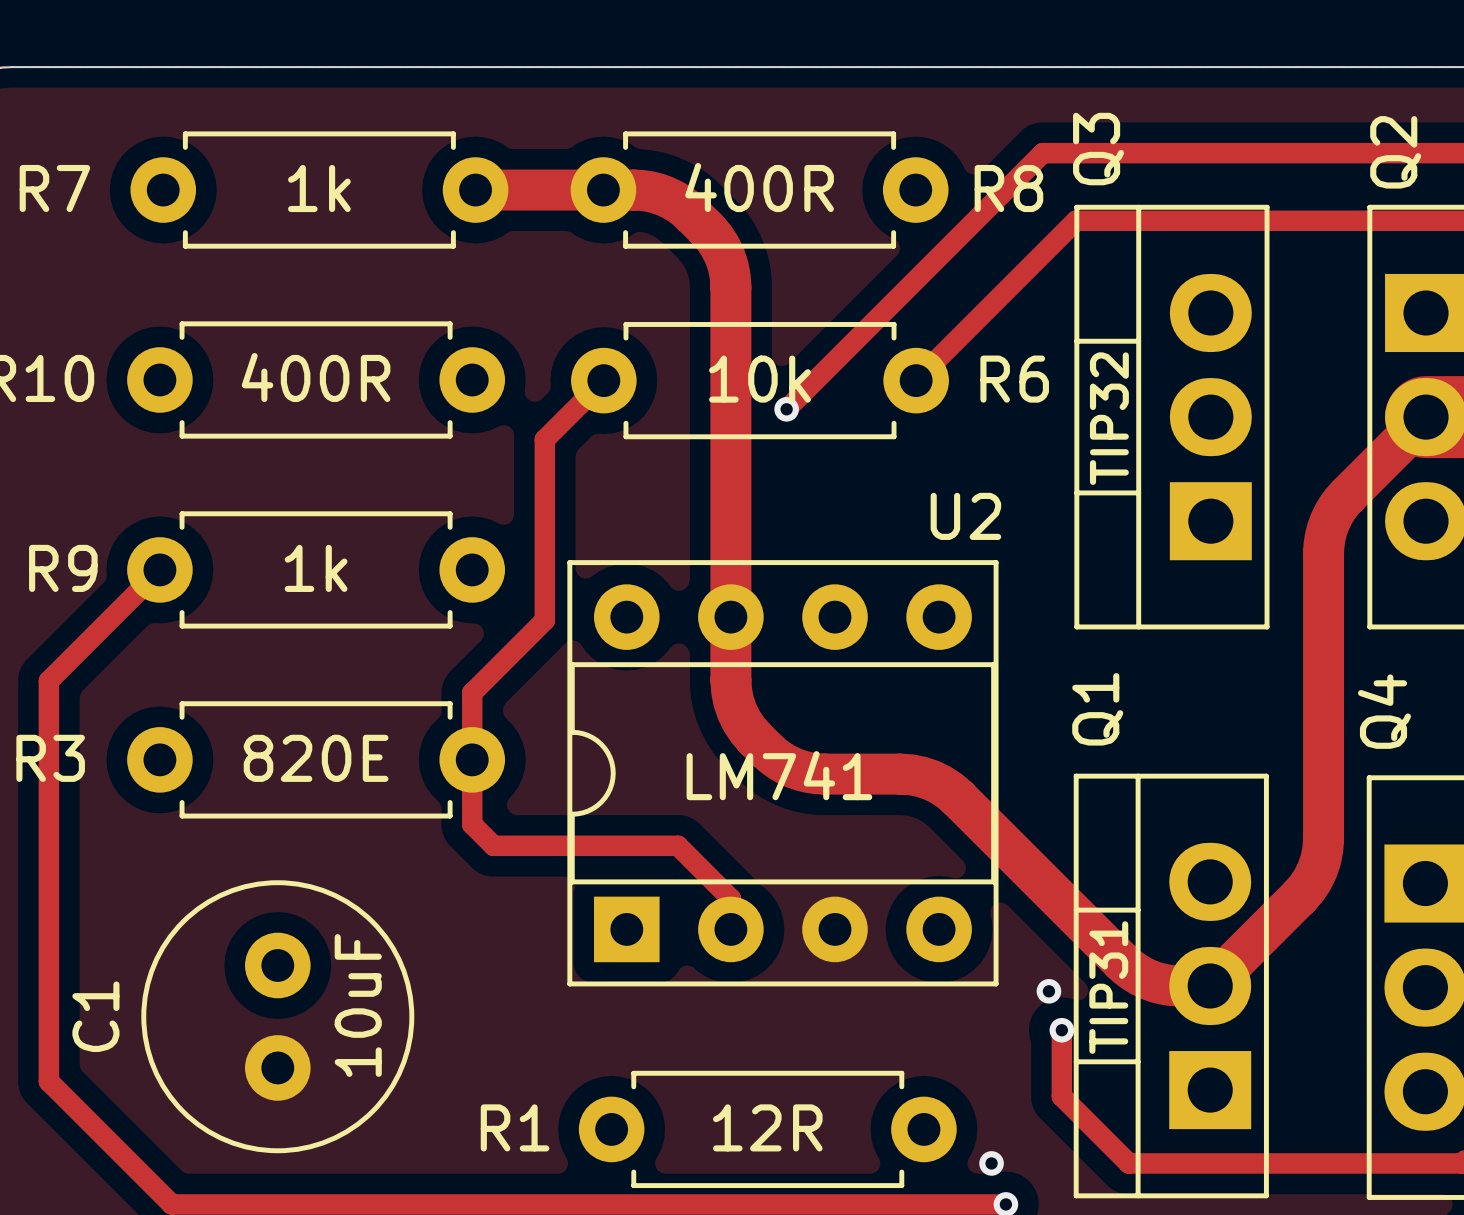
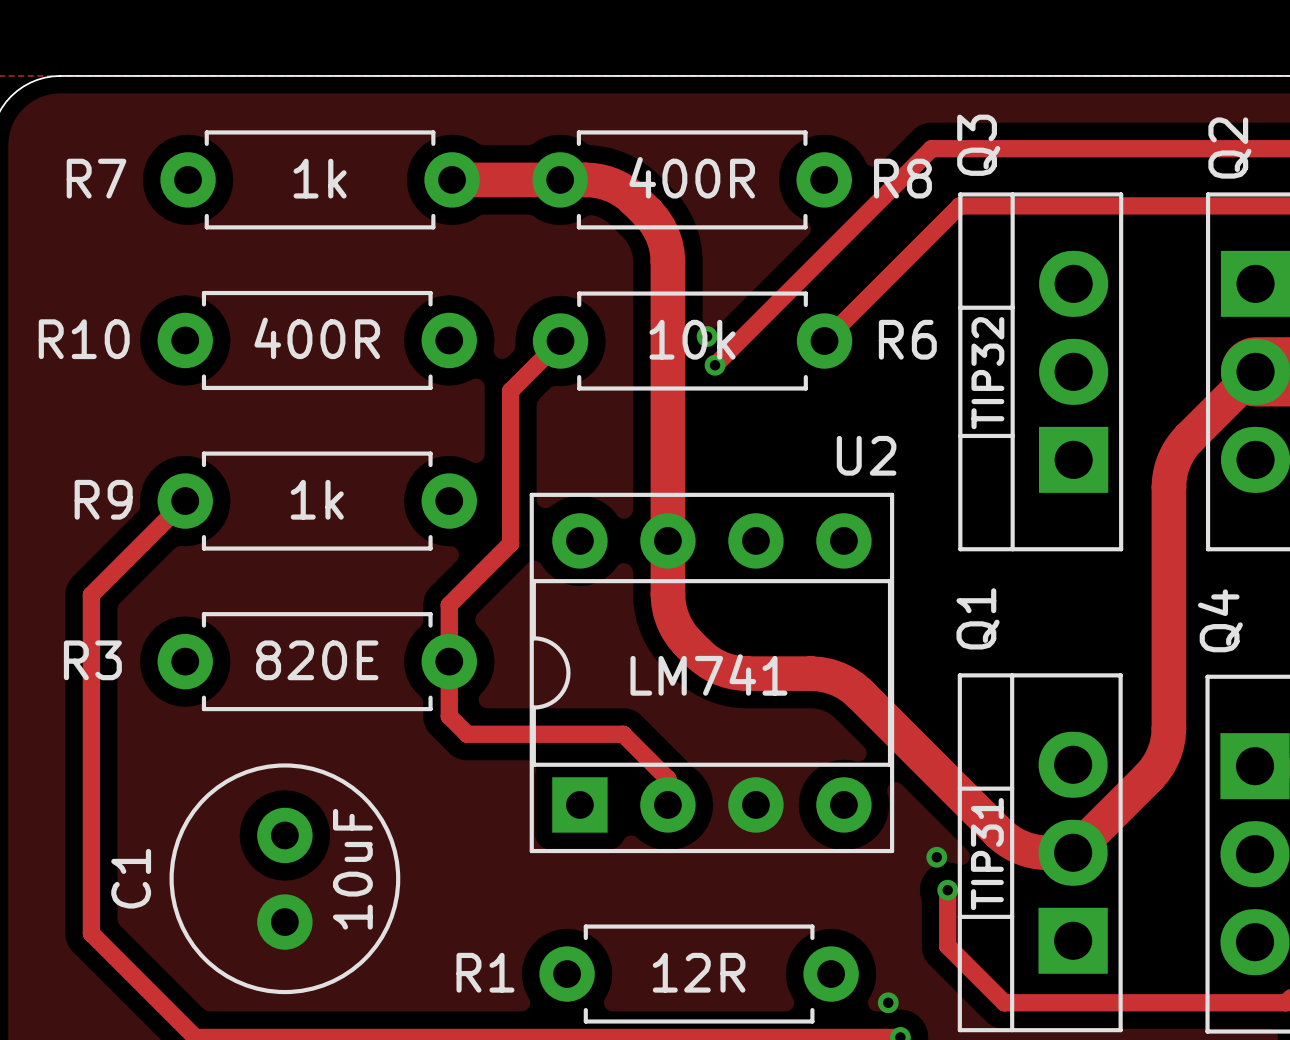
via: none -> (707, 336)

